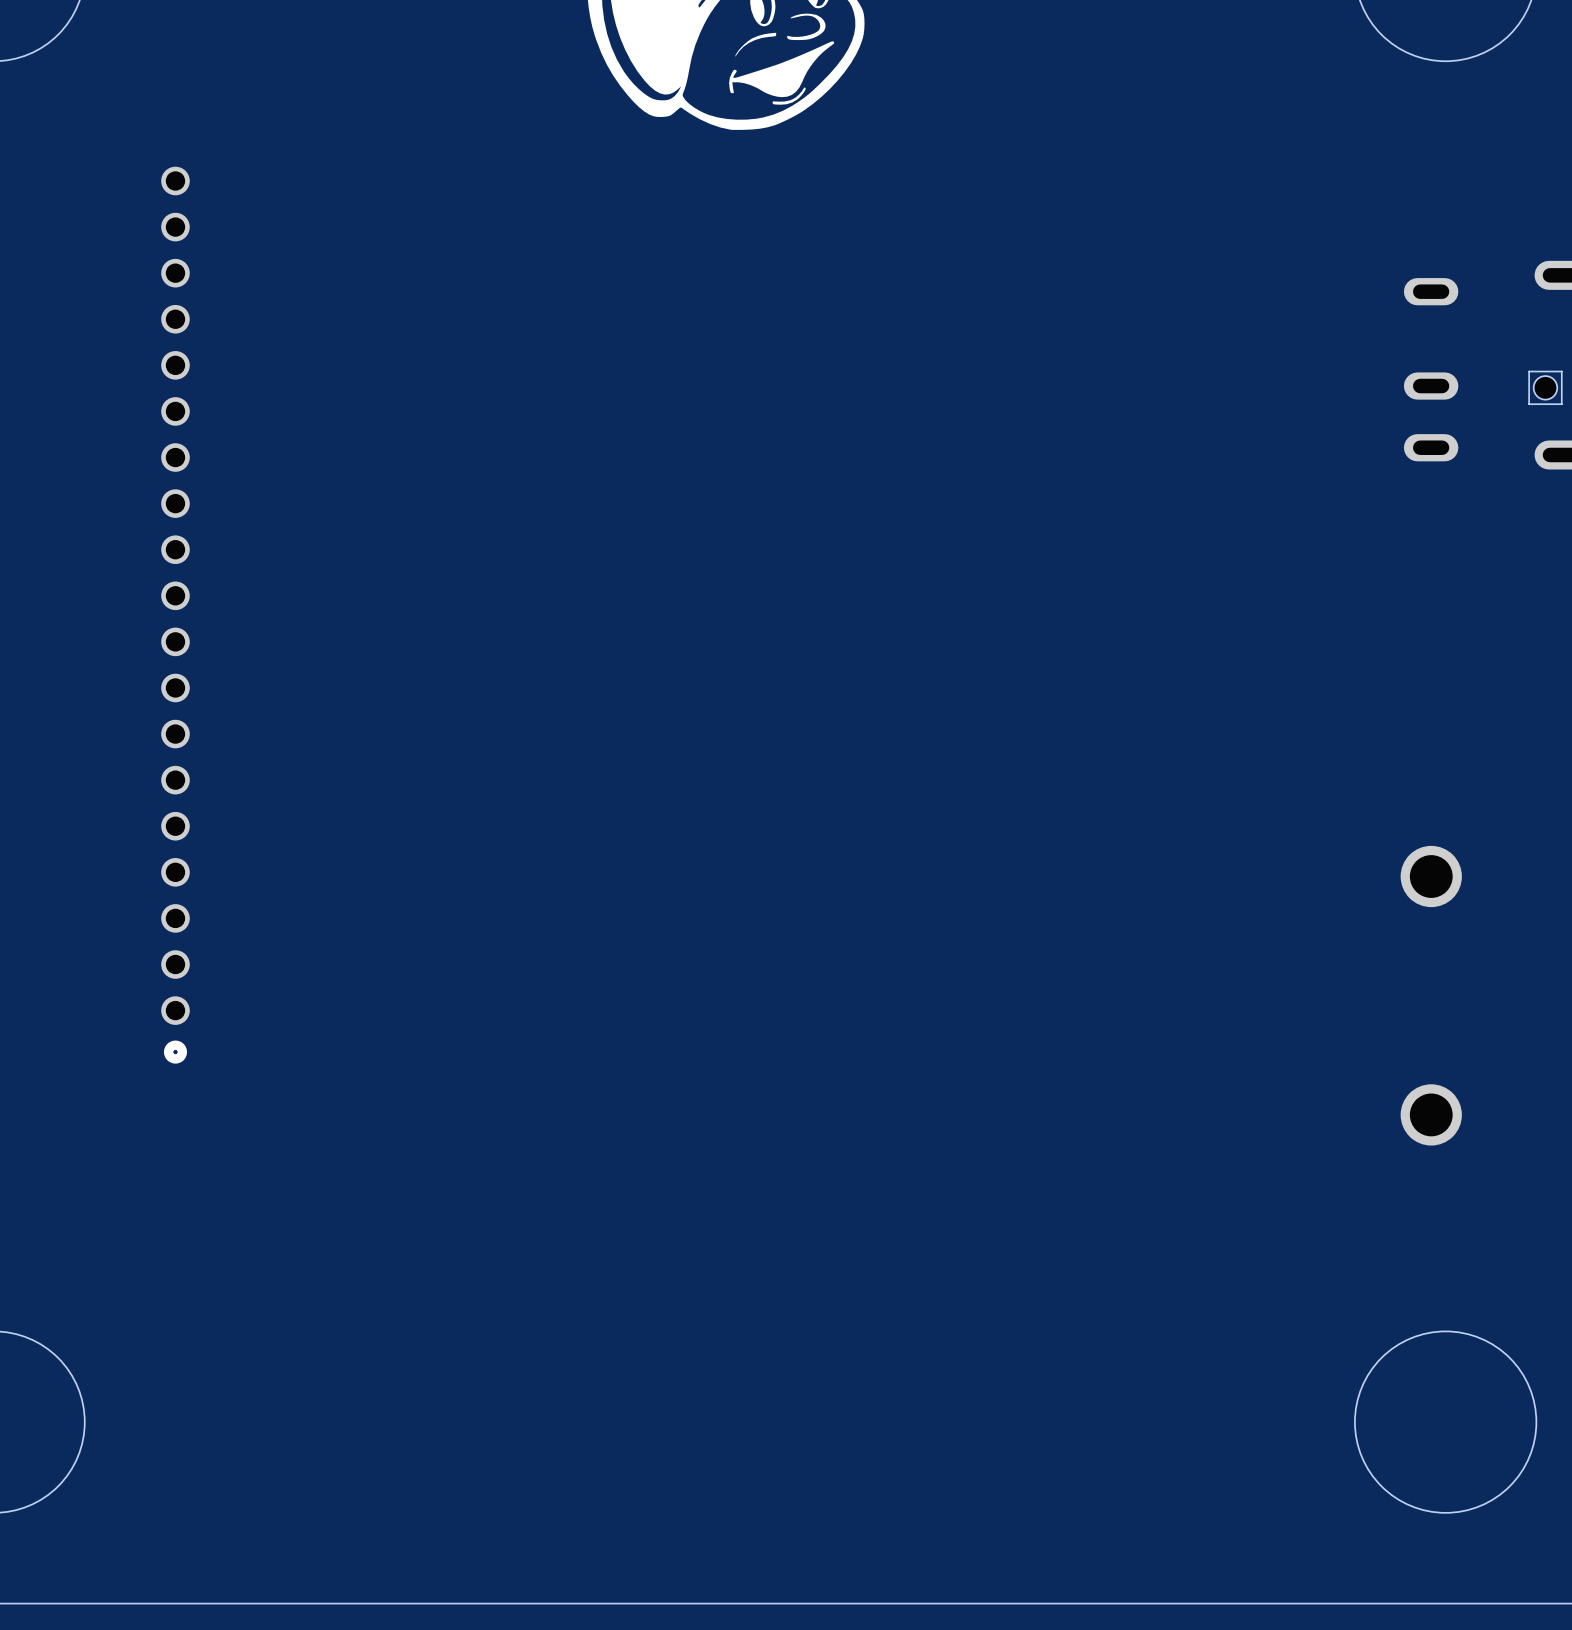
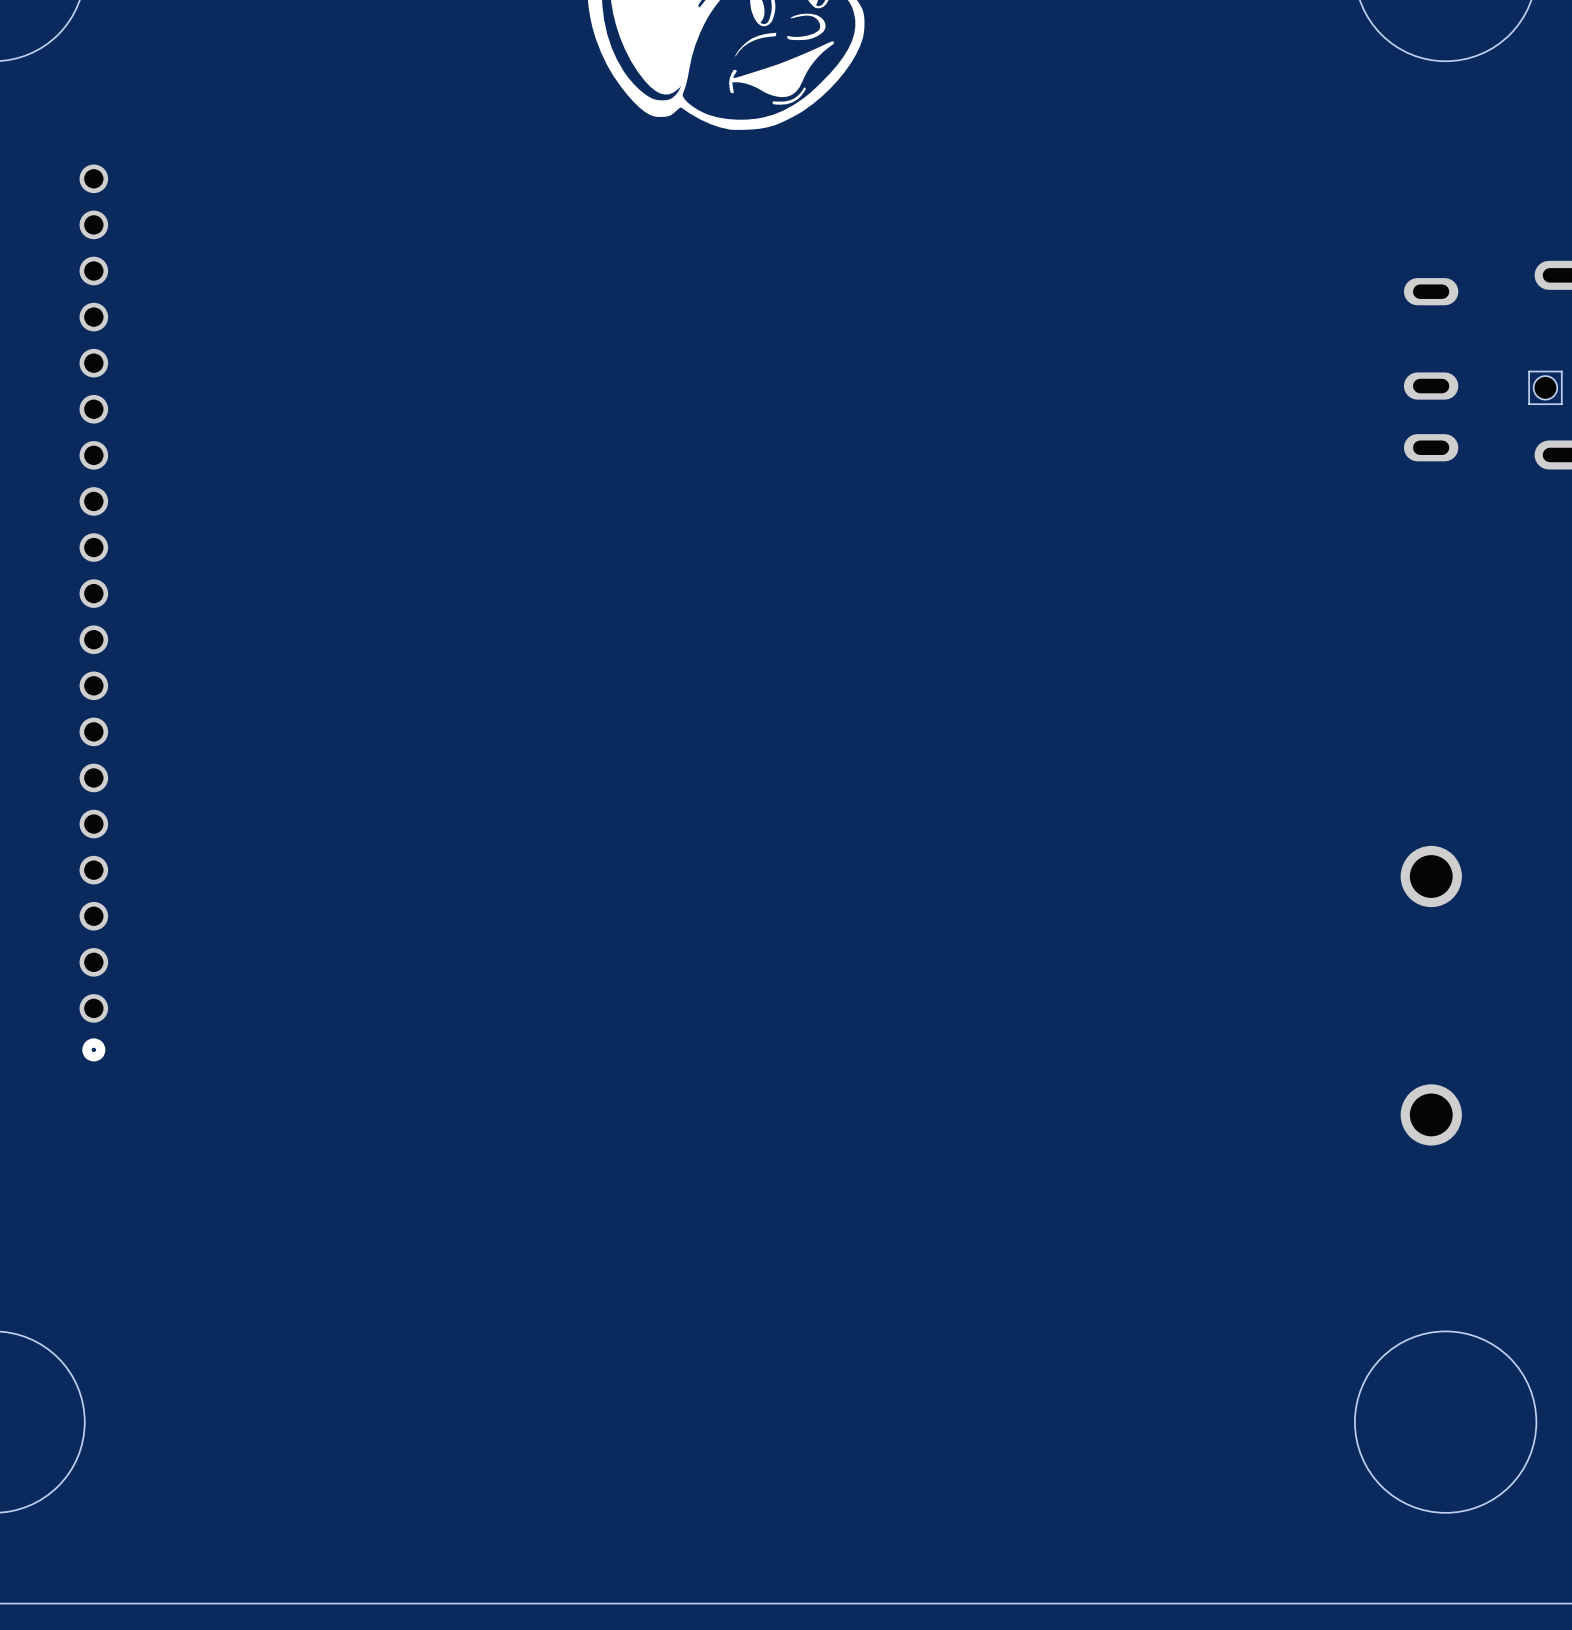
part: none -> (93, 612)
part: (175, 615) -> none

